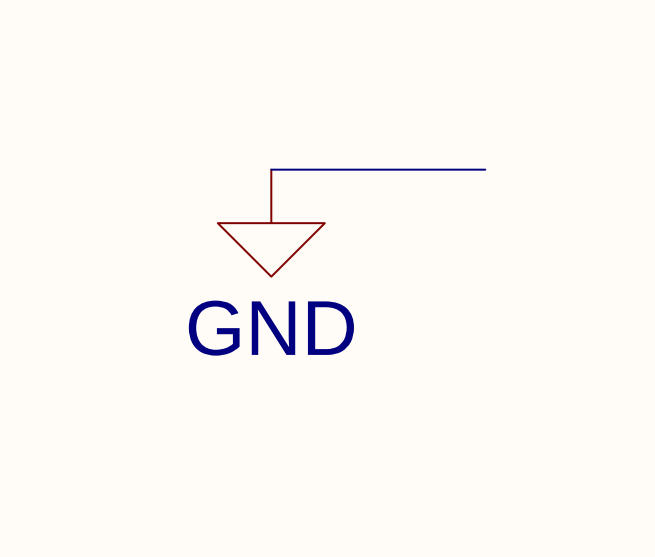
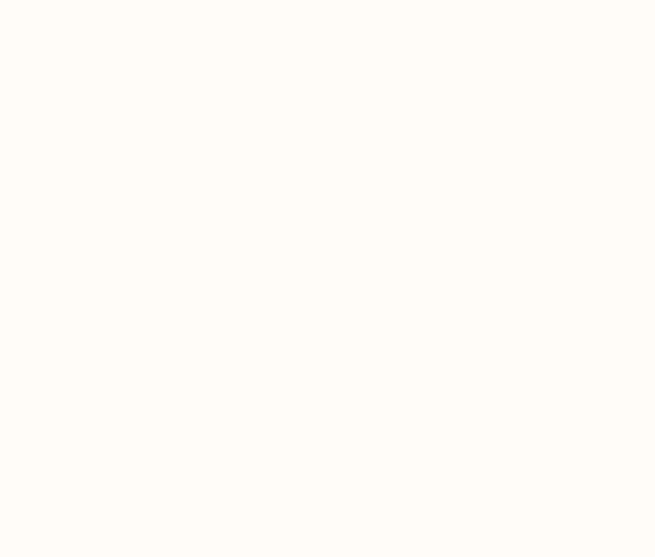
wire: (271, 169) (485, 169) -> none
power symbol: GND (271, 223) -> none

